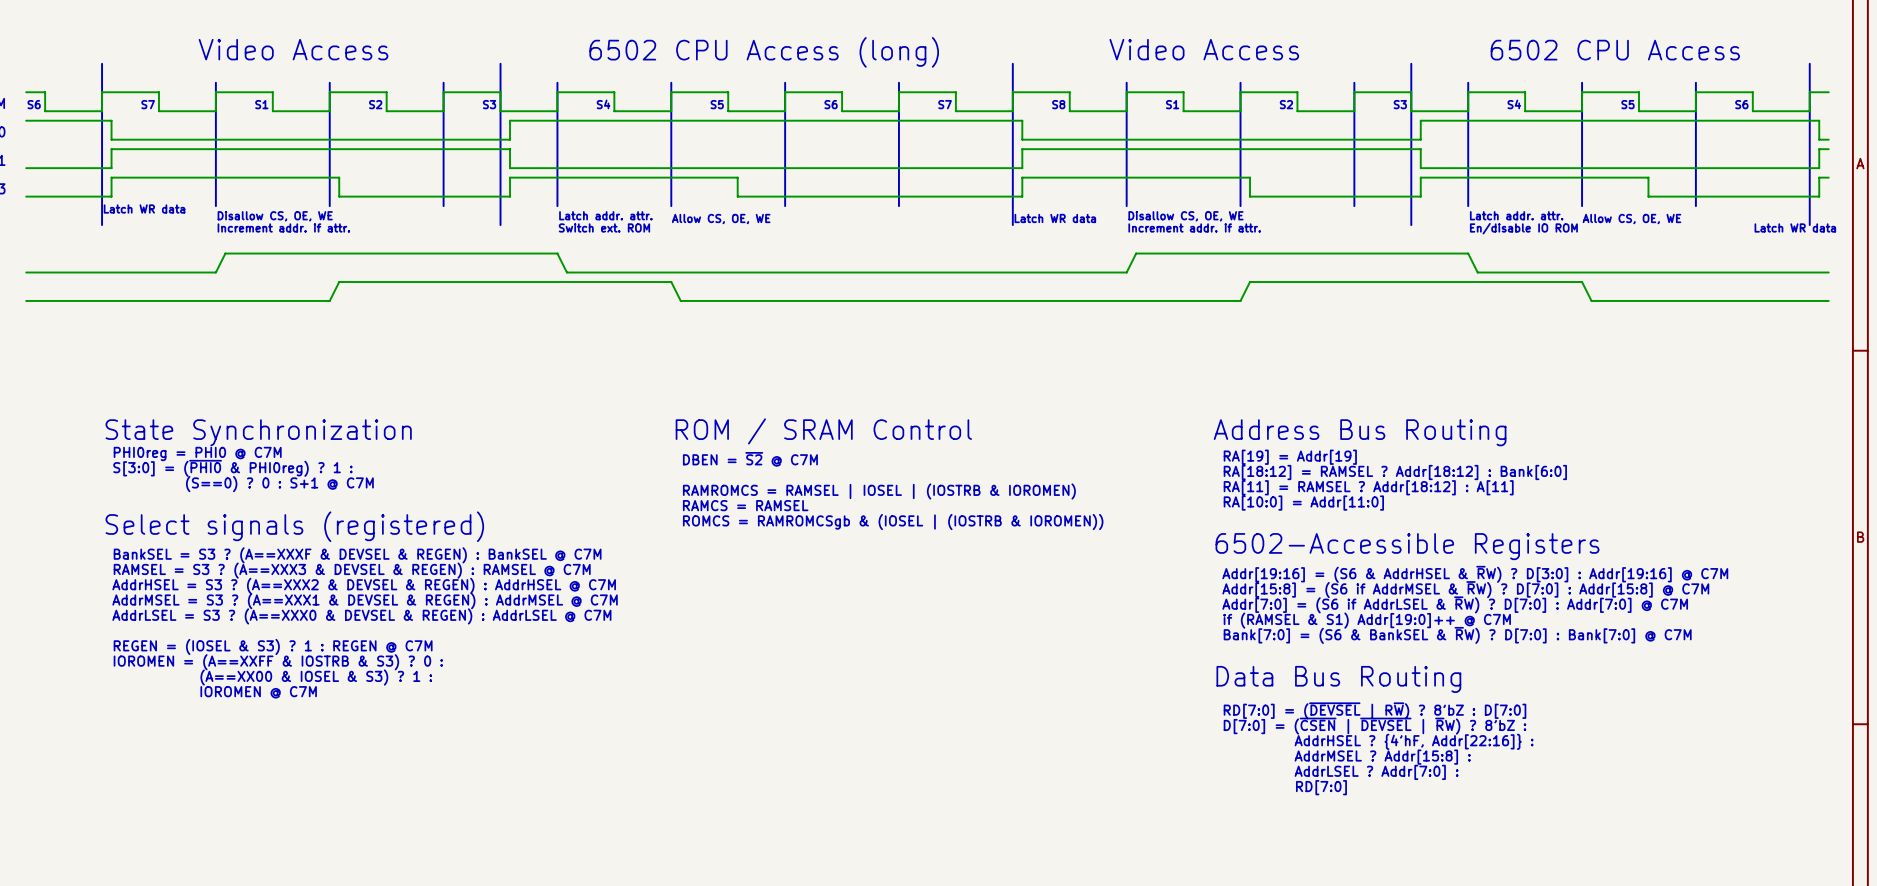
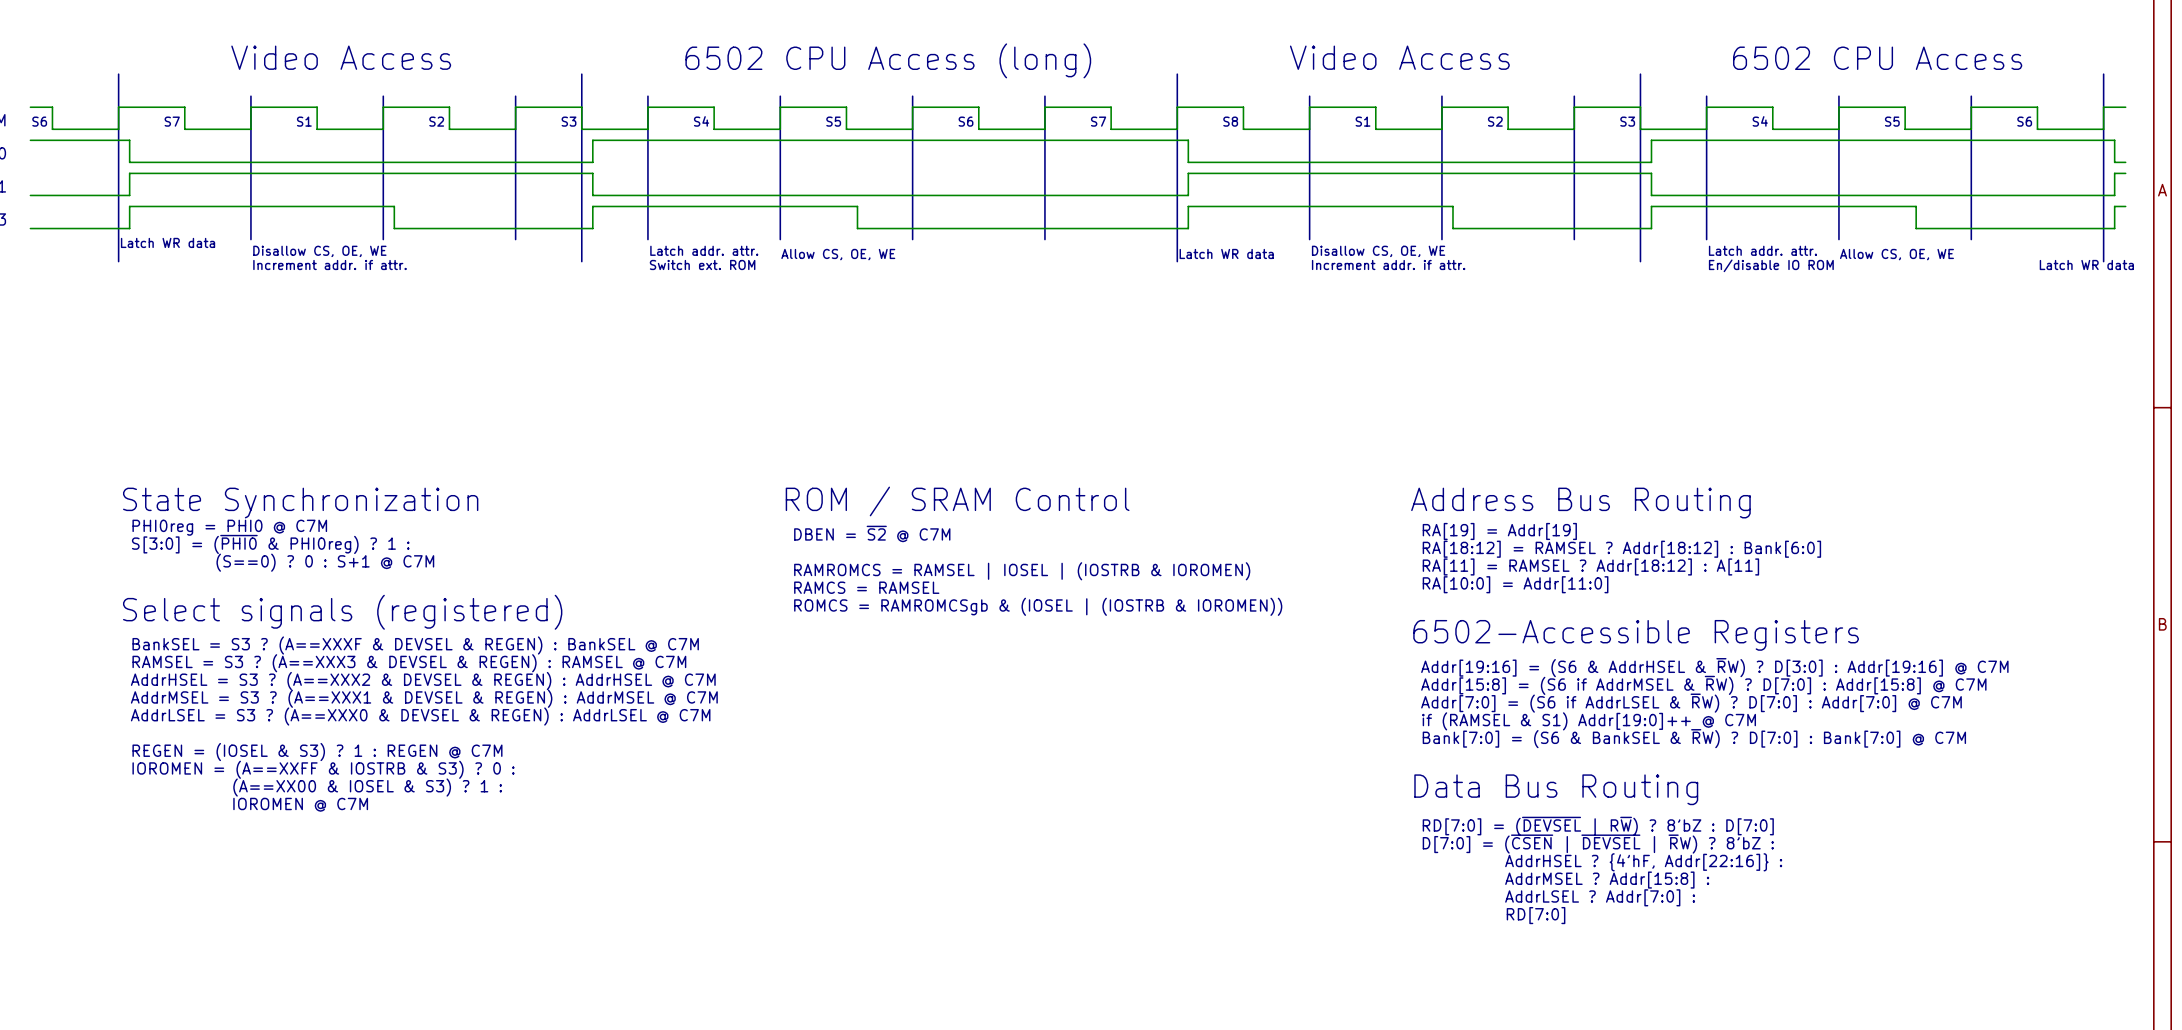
wire: (26, 272) (215, 272) (225, 253) (557, 253) (566, 272) (1126, 272) (1136, 253) (1468, 253) (1477, 272) (1828, 272) -> none
wire: (26, 300) (329, 300) (339, 281) (671, 281) (680, 300) (1240, 300) (1250, 281) (1582, 281) (1591, 300) (1828, 300) -> none

